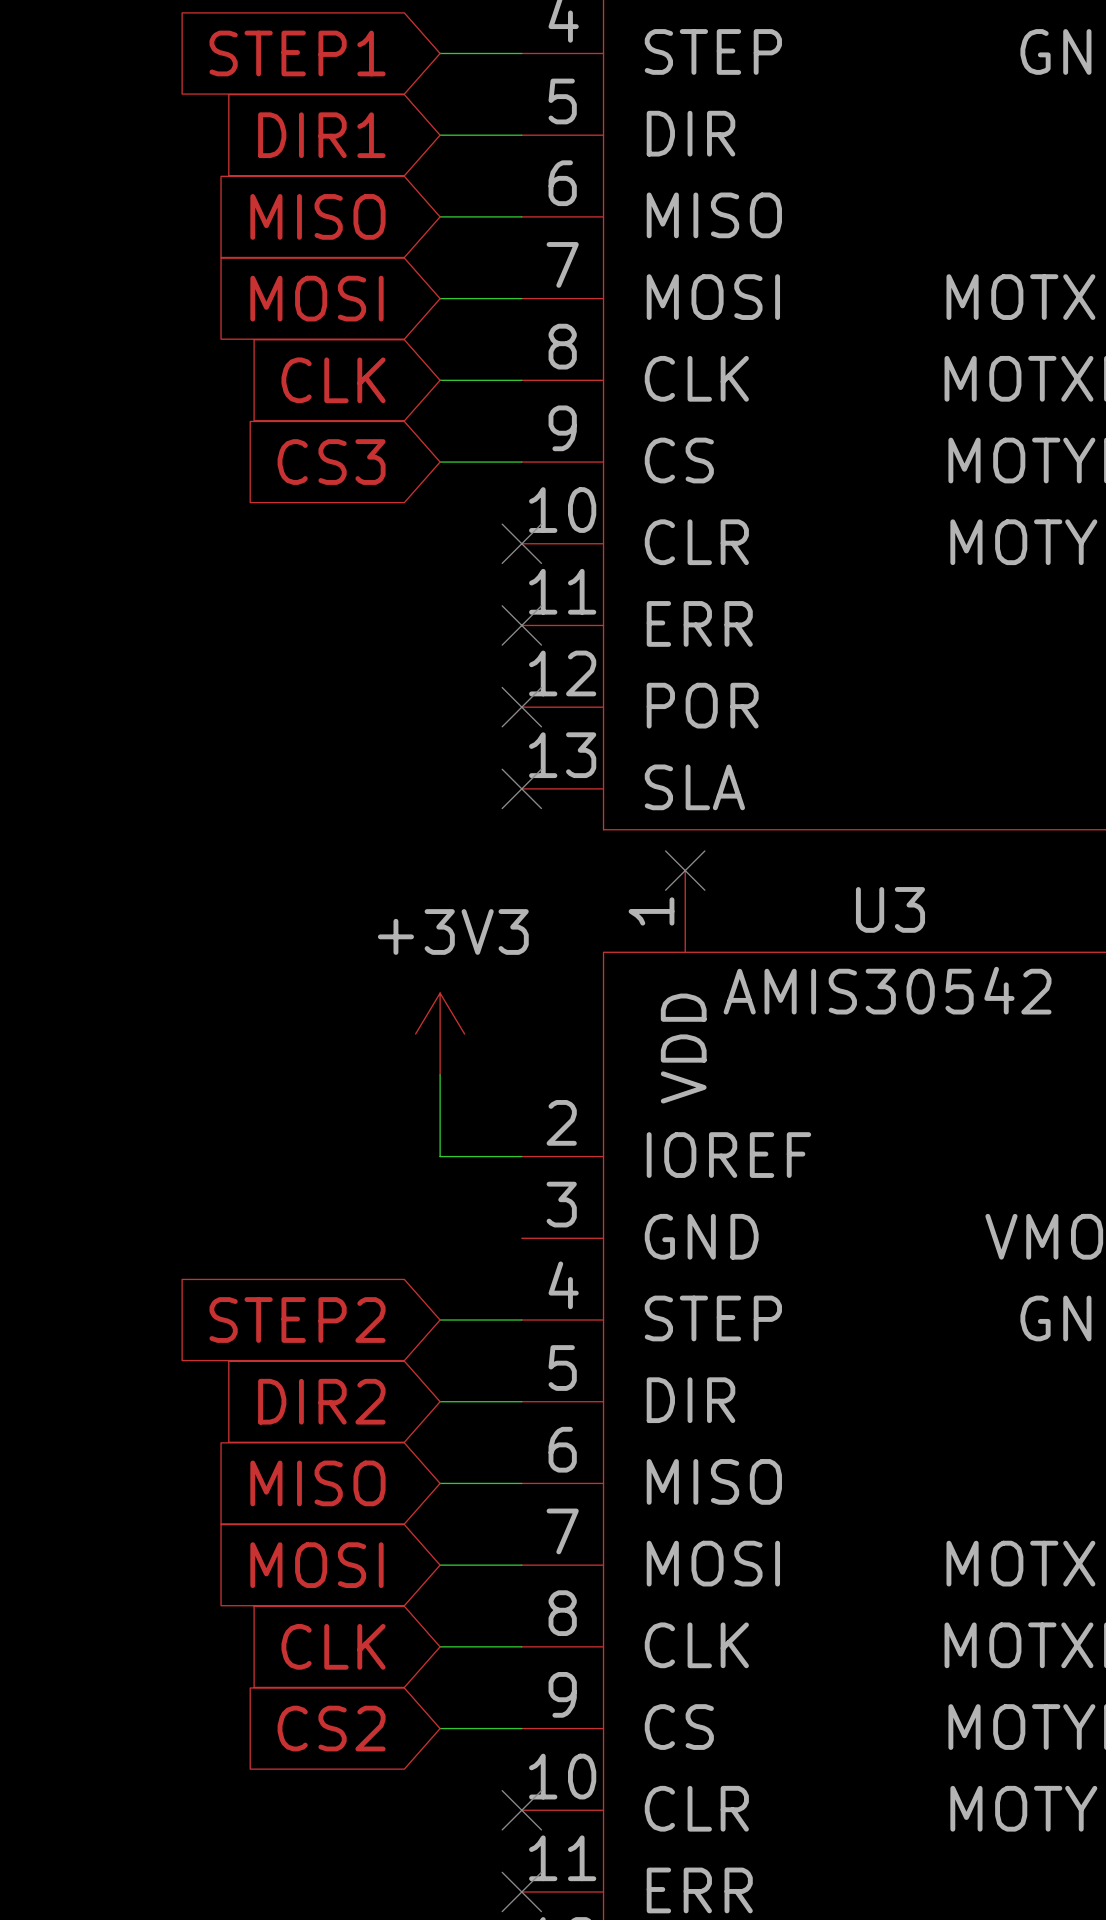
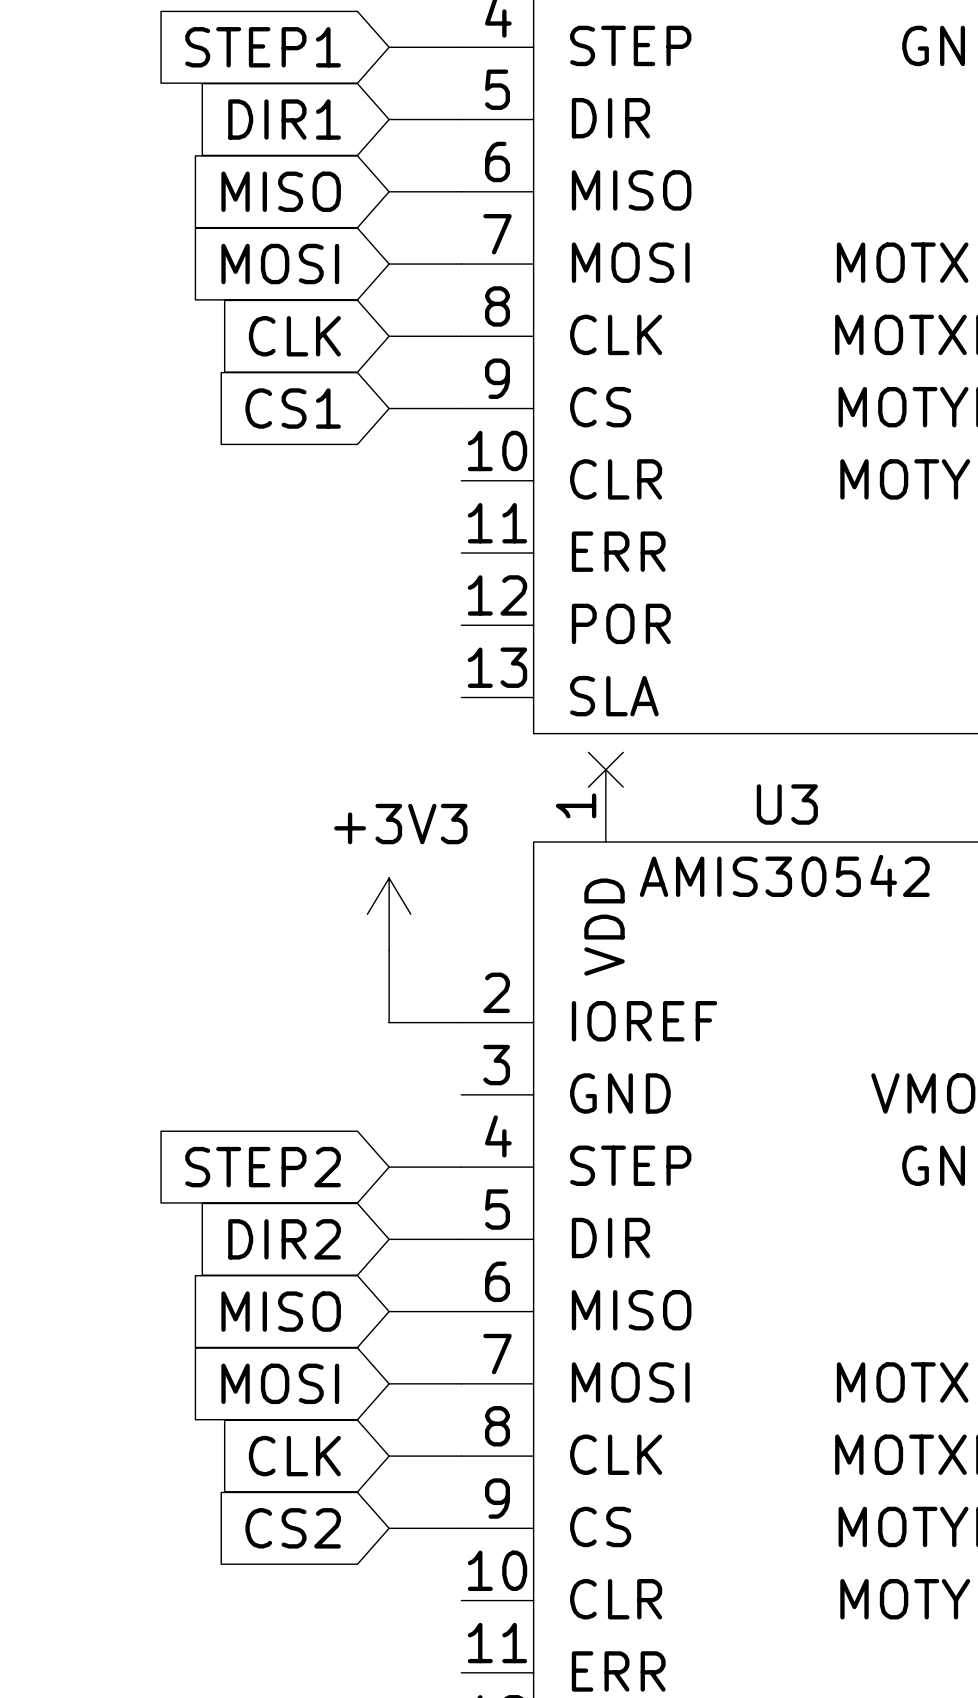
global label: CS3 (331, 462) -> CS1 (293, 408)
no-connect mark: (521, 543) -> none
no-connect mark: (521, 625) -> none
no-connect mark: (521, 707) -> none
no-connect mark: (521, 788) -> none
no-connect mark: (521, 1810) -> none
no-connect mark: (521, 1891) -> none

